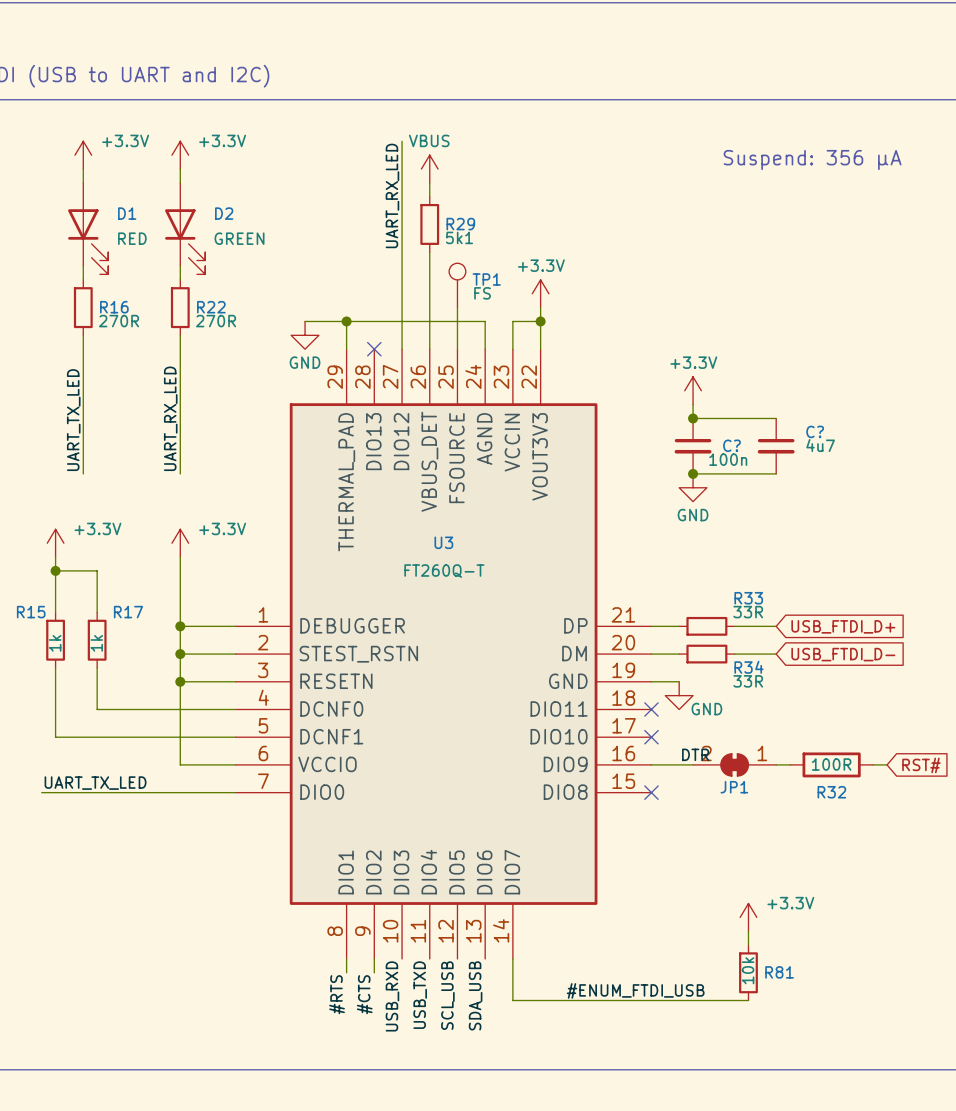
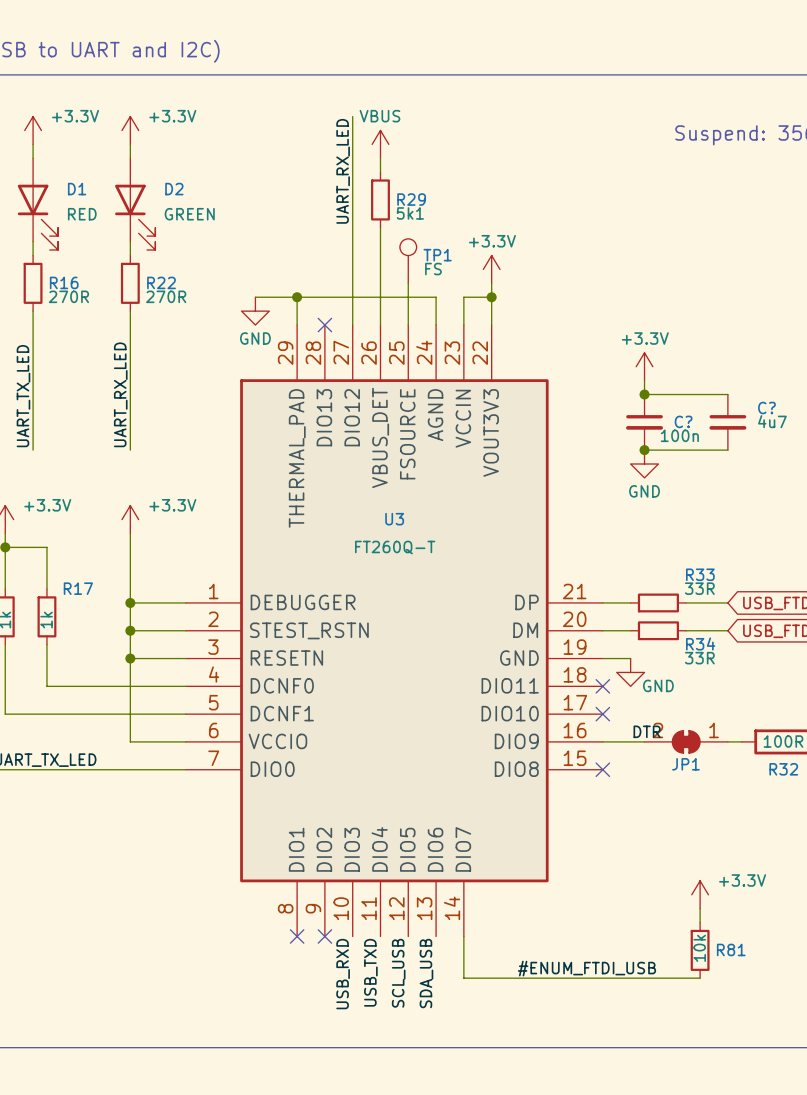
wire: (346, 958) (346, 972) -> none
no-connect mark: none -> (297, 936)
wire: (374, 958) (374, 972) -> none
no-connect mark: none -> (324, 936)
label: #RTS (337, 994) -> none
label: #CTS (364, 994) -> none

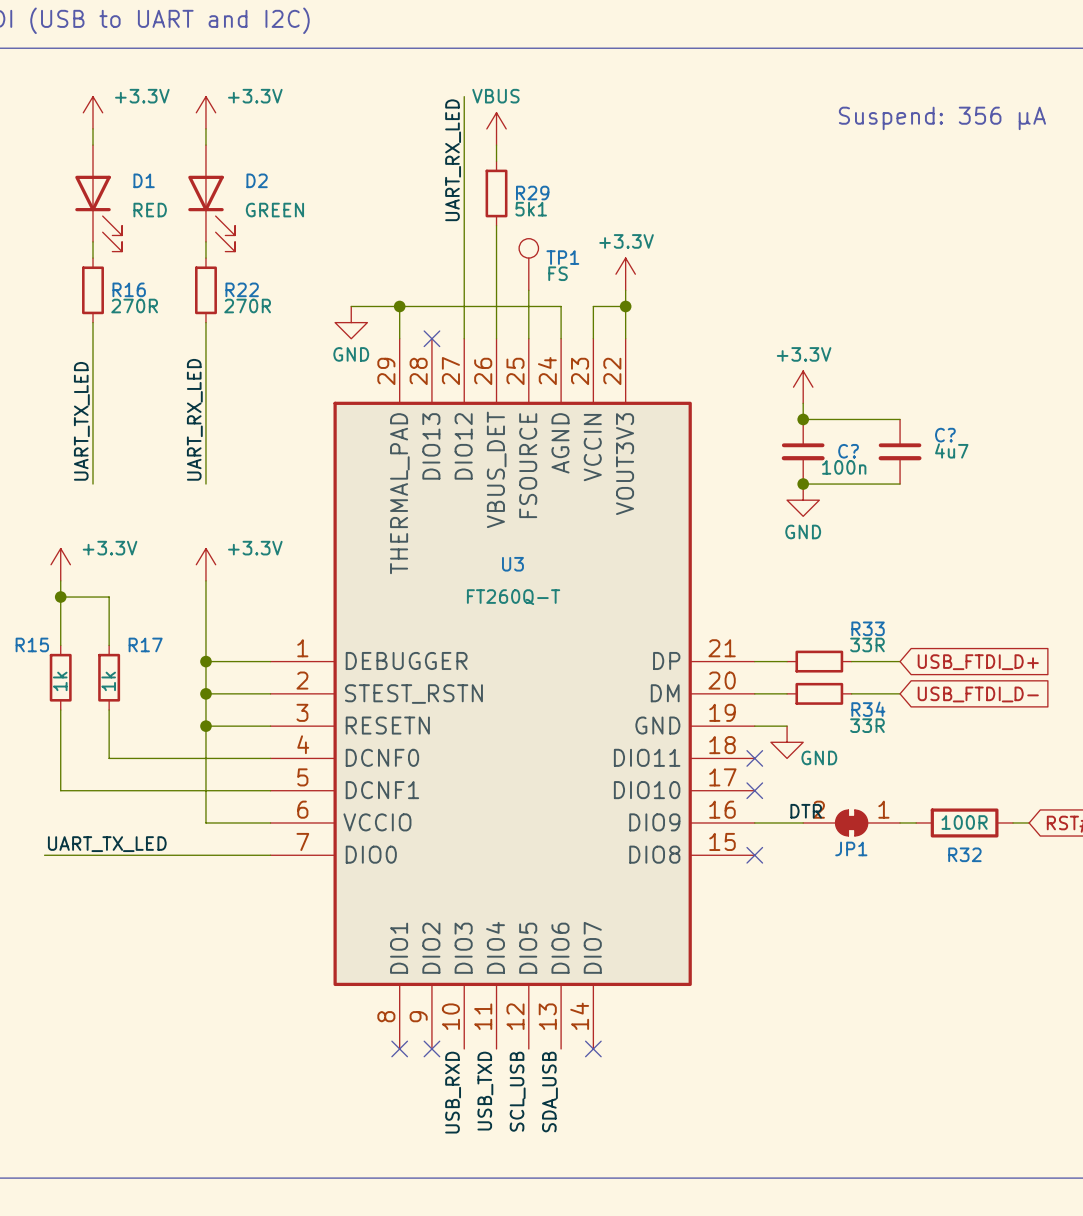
power symbol: +3.3V (700, 894) -> none
wire: (700, 908) (700, 922) -> none
wire: (463, 936) (463, 978) (700, 978) -> none
no-connect mark: none -> (593, 1048)
R81: 10k (700, 950) -> none
label: #ENUM_FTDI_USB (586, 968) -> none

